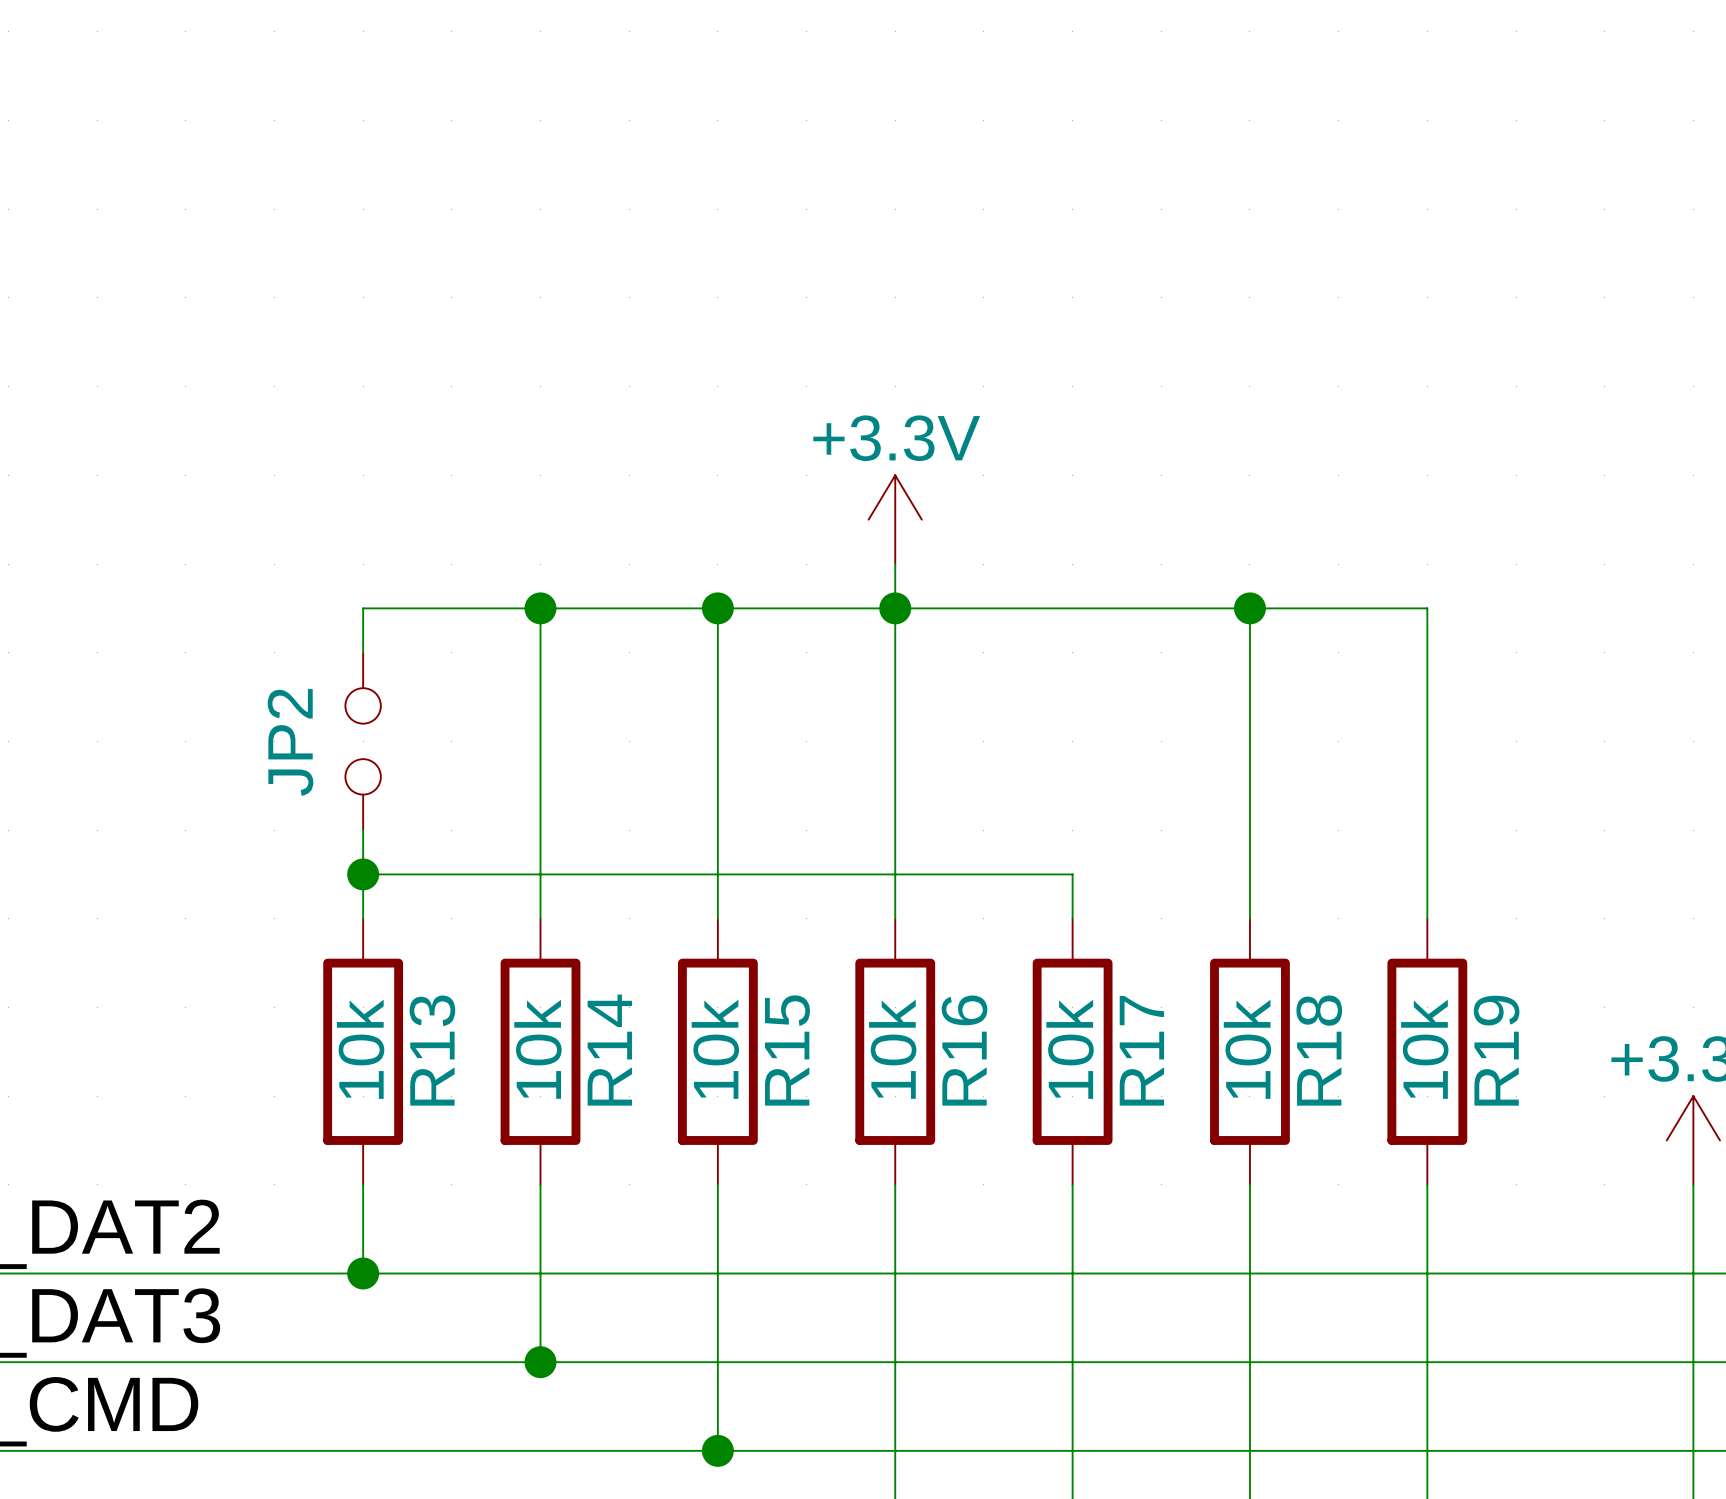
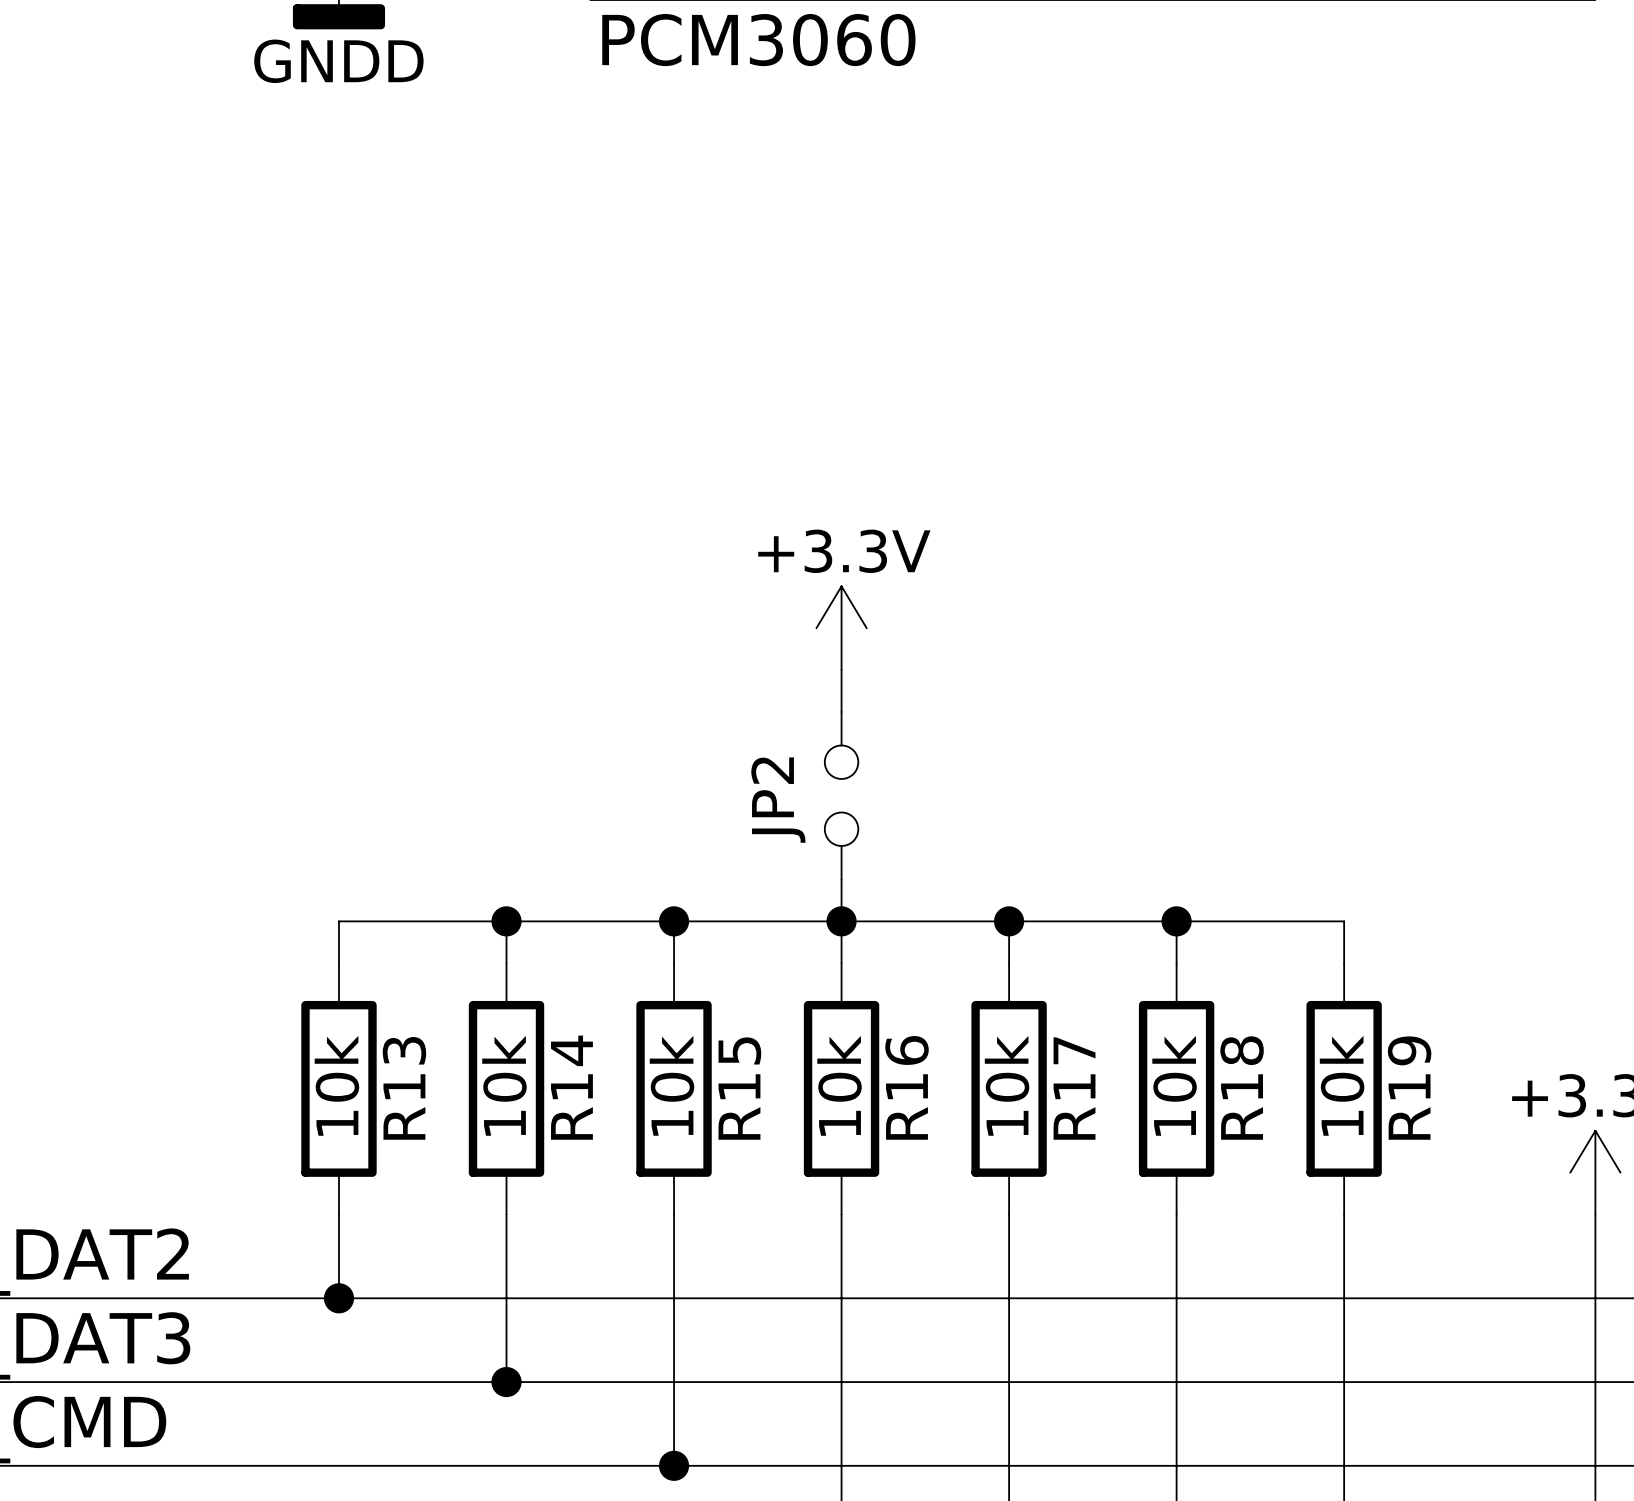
power symbol position: +3.3V (895, 519) -> +3.3V (841, 628)
wire: (540, 608) (540, 874) -> none
junction: (540, 608) -> none
wire: (717, 608) (717, 874) -> none
junction: (717, 608) -> none
junction: (895, 608) -> none
wire: (1249, 608) (1249, 874) -> none
junction: (1249, 608) -> none
wire: (363, 652) (363, 608) (1427, 608) (1427, 874) -> (1009, 921) (1344, 921)
wire: (895, 652) (895, 830) -> none
JP2 position: (363, 741) -> (841, 795)
wire: (363, 830) (363, 874) -> none
junction: (363, 874) -> none
junction: none -> (506, 921)
junction: none -> (674, 921)
junction: none -> (841, 921)
junction: none -> (1009, 921)
junction: none -> (1176, 921)

